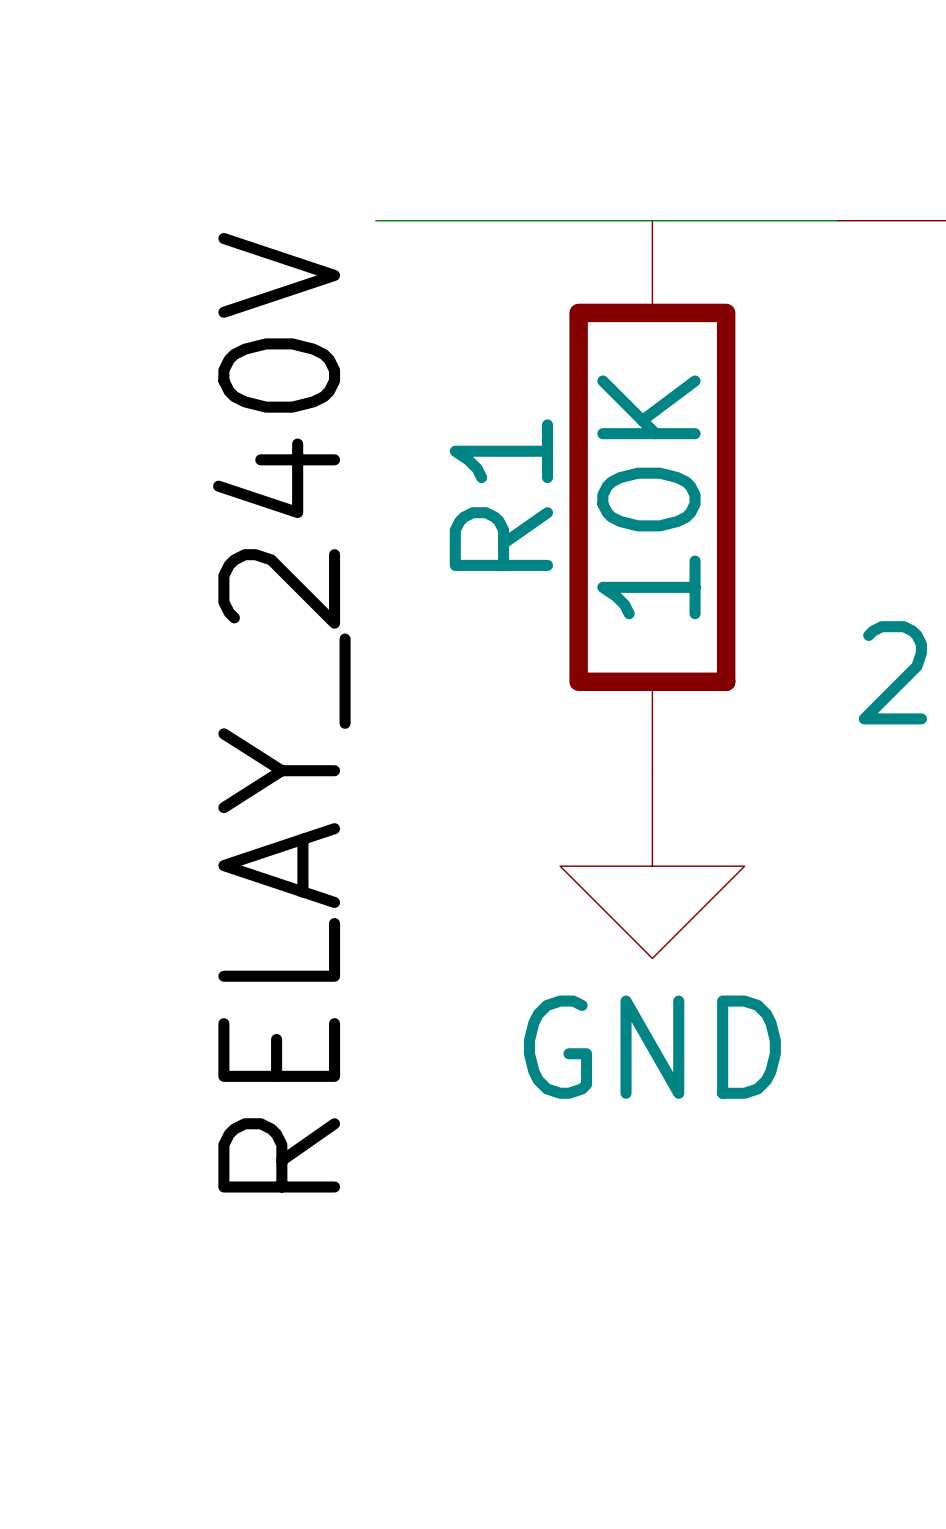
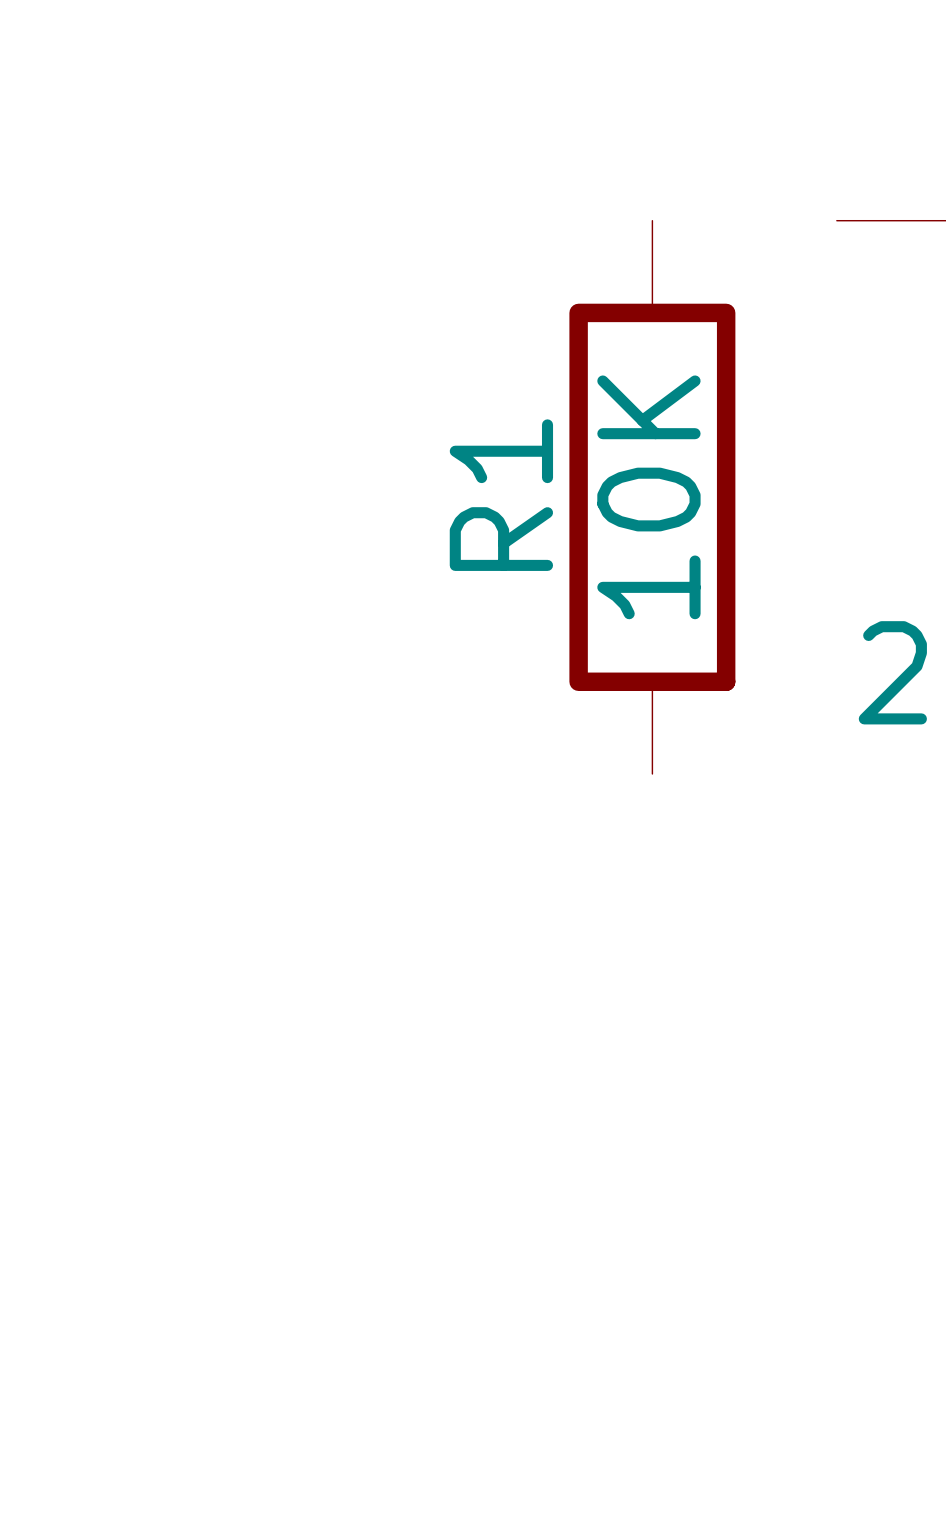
wire: (375, 220) (836, 220) -> none
label: RELAY_240V (281, 712) -> none
power symbol: GND (652, 866) -> none

